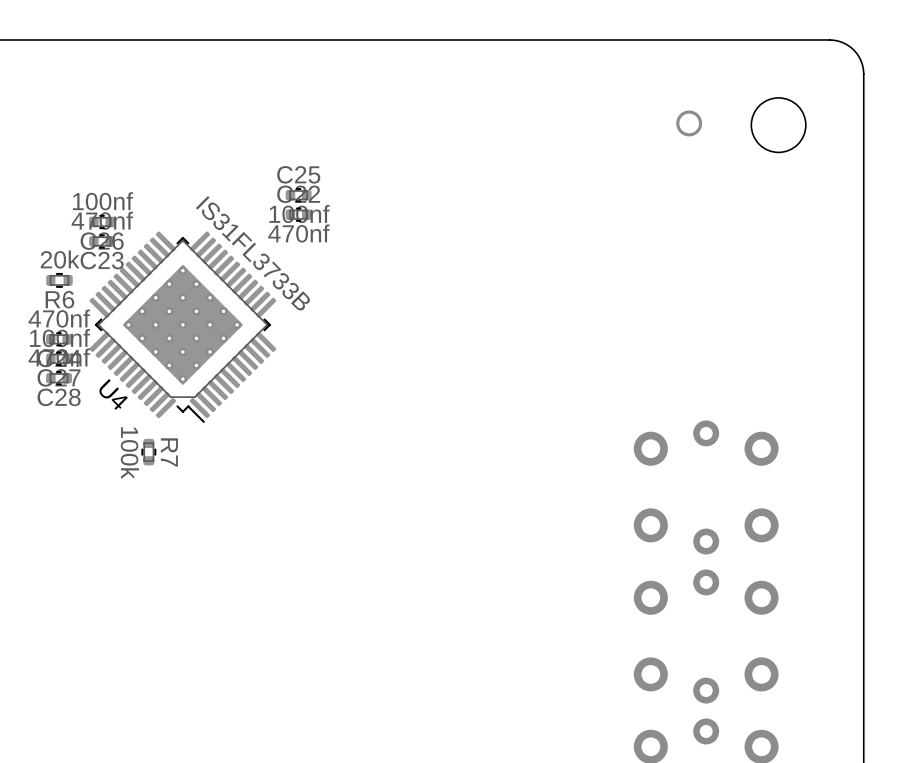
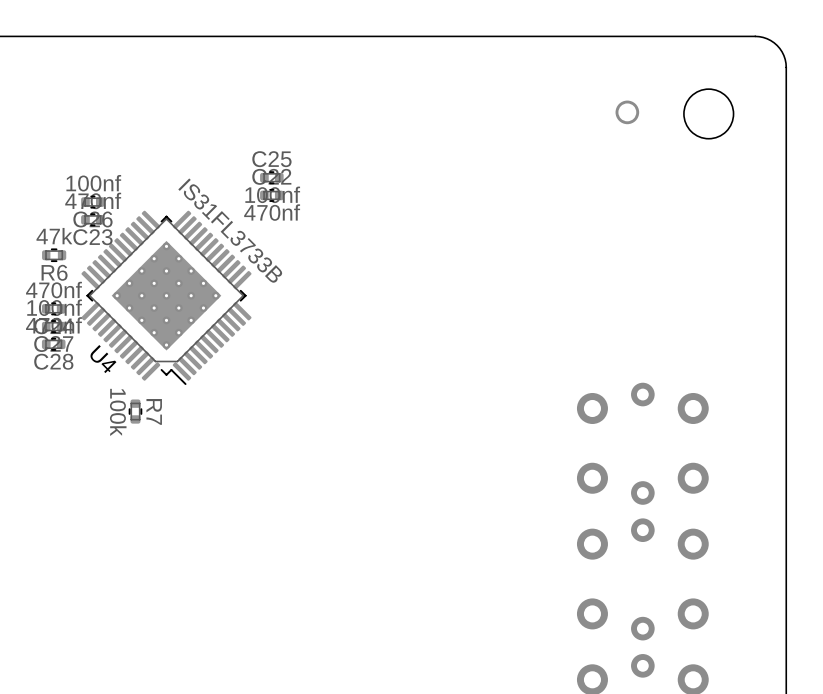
R6 value: 20k (60, 259) -> 47k (54, 236)

